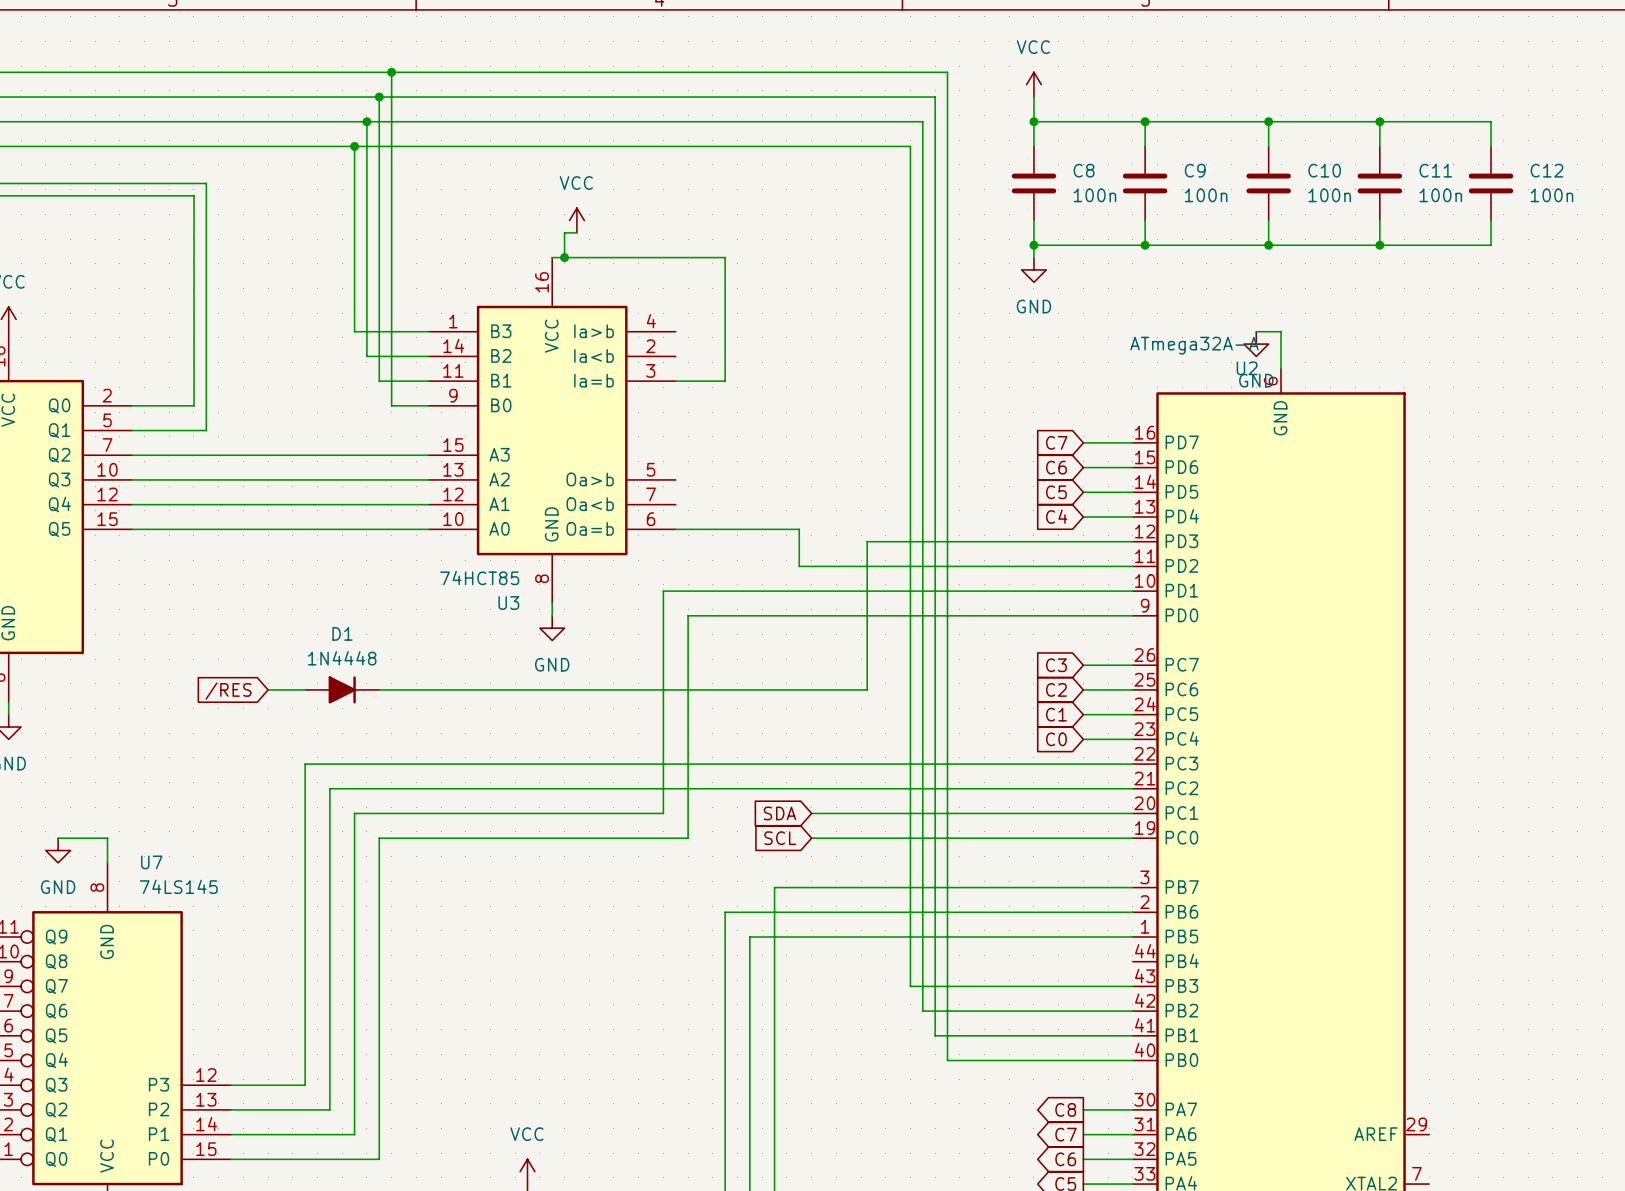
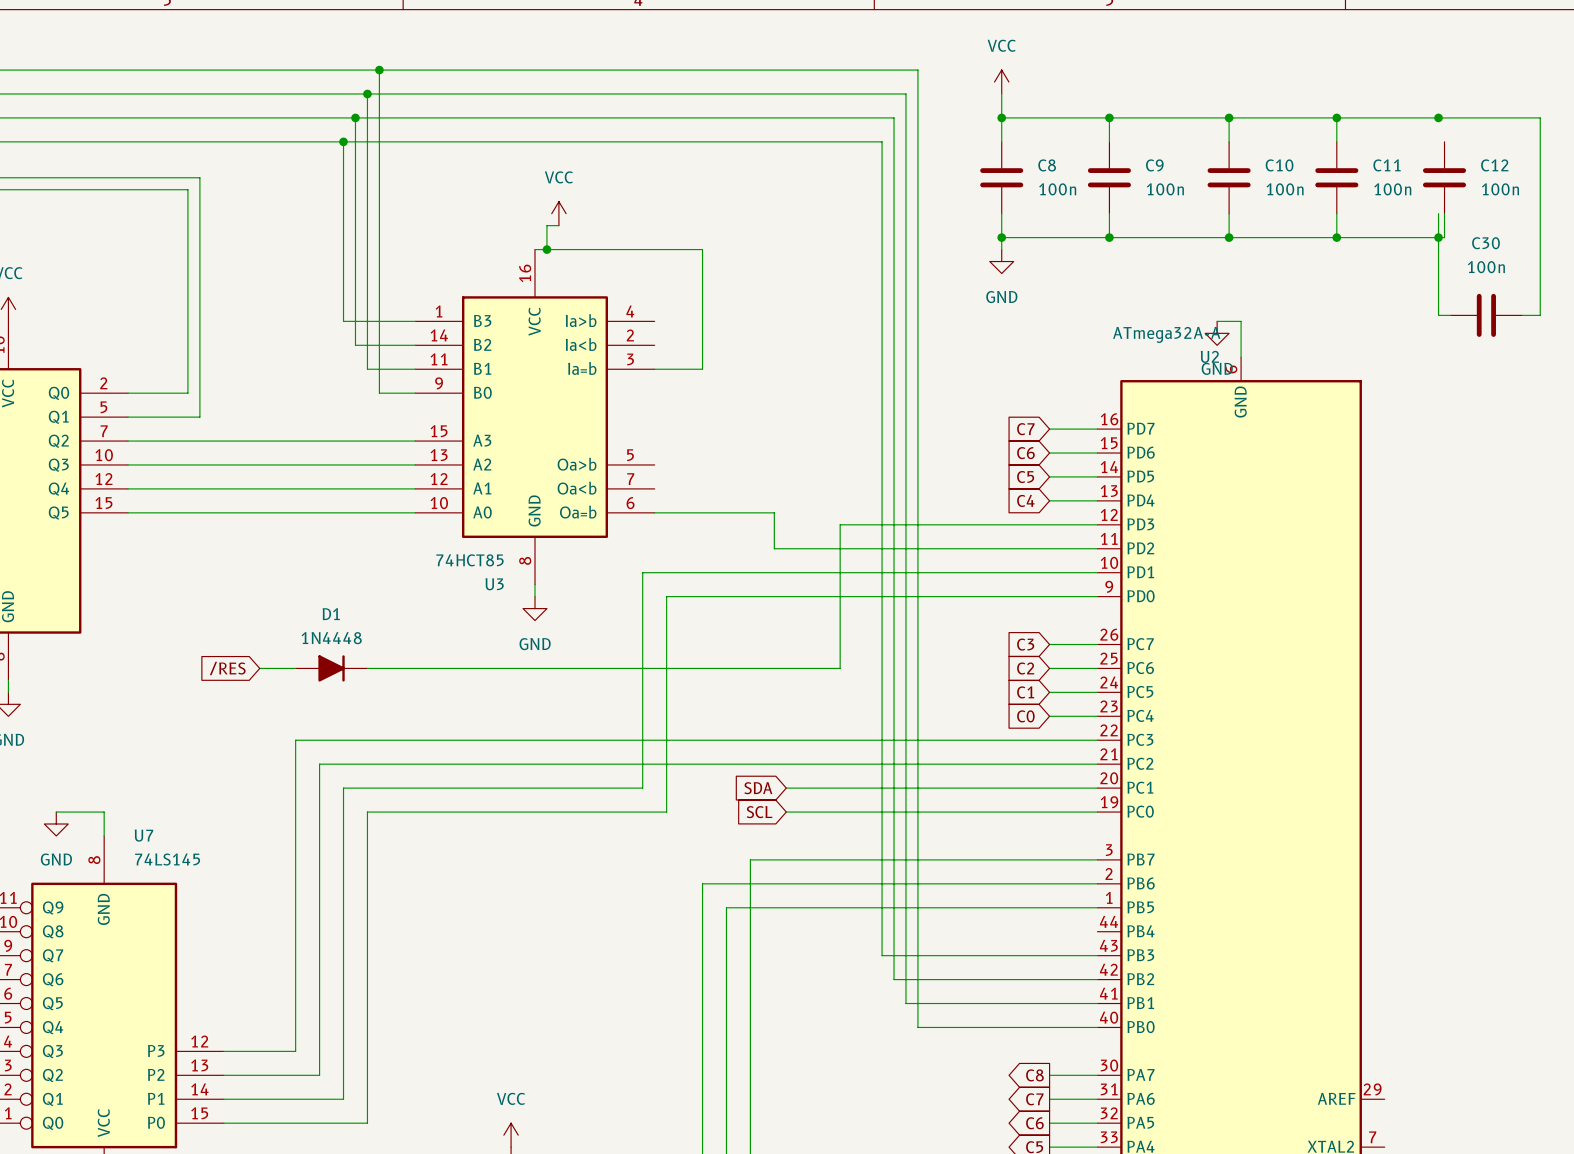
junction: none -> (1438, 117)
wire: (1491, 121) (1491, 146) -> (1444, 117) (1540, 117) (1540, 315) (1522, 315)
wire: none -> (1438, 213) (1438, 315) (1450, 315)
junction: none -> (1438, 237)
C30: none -> 100n (1486, 315)

